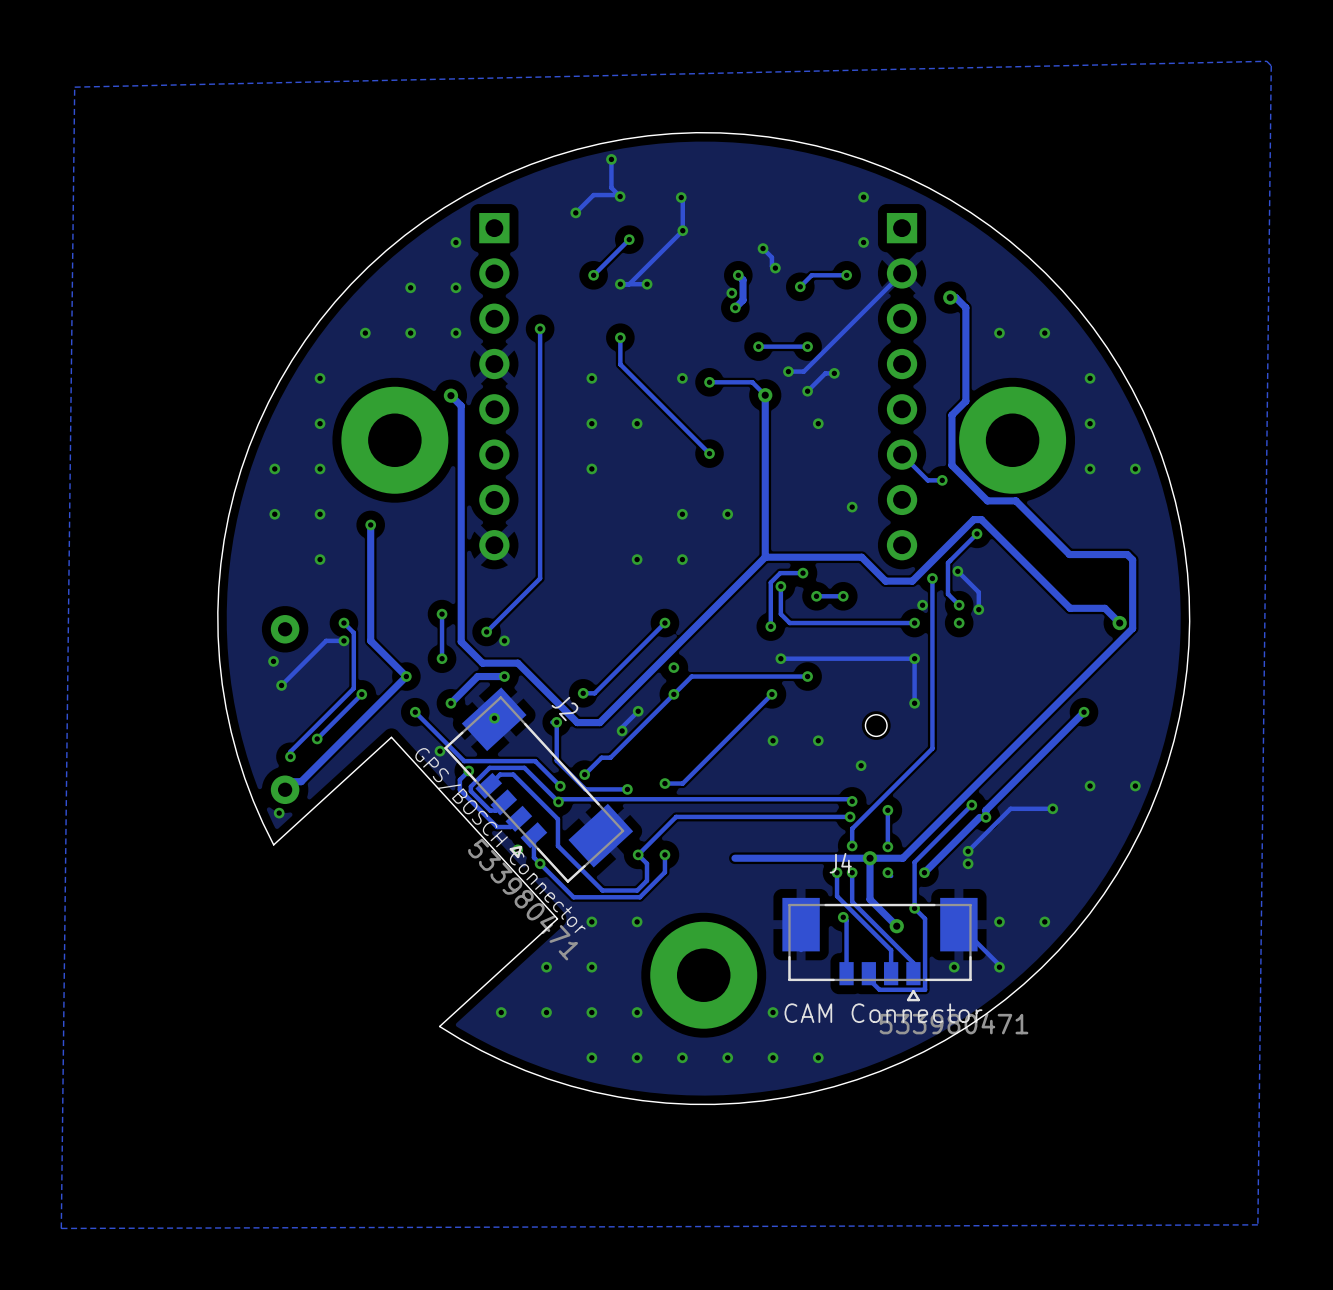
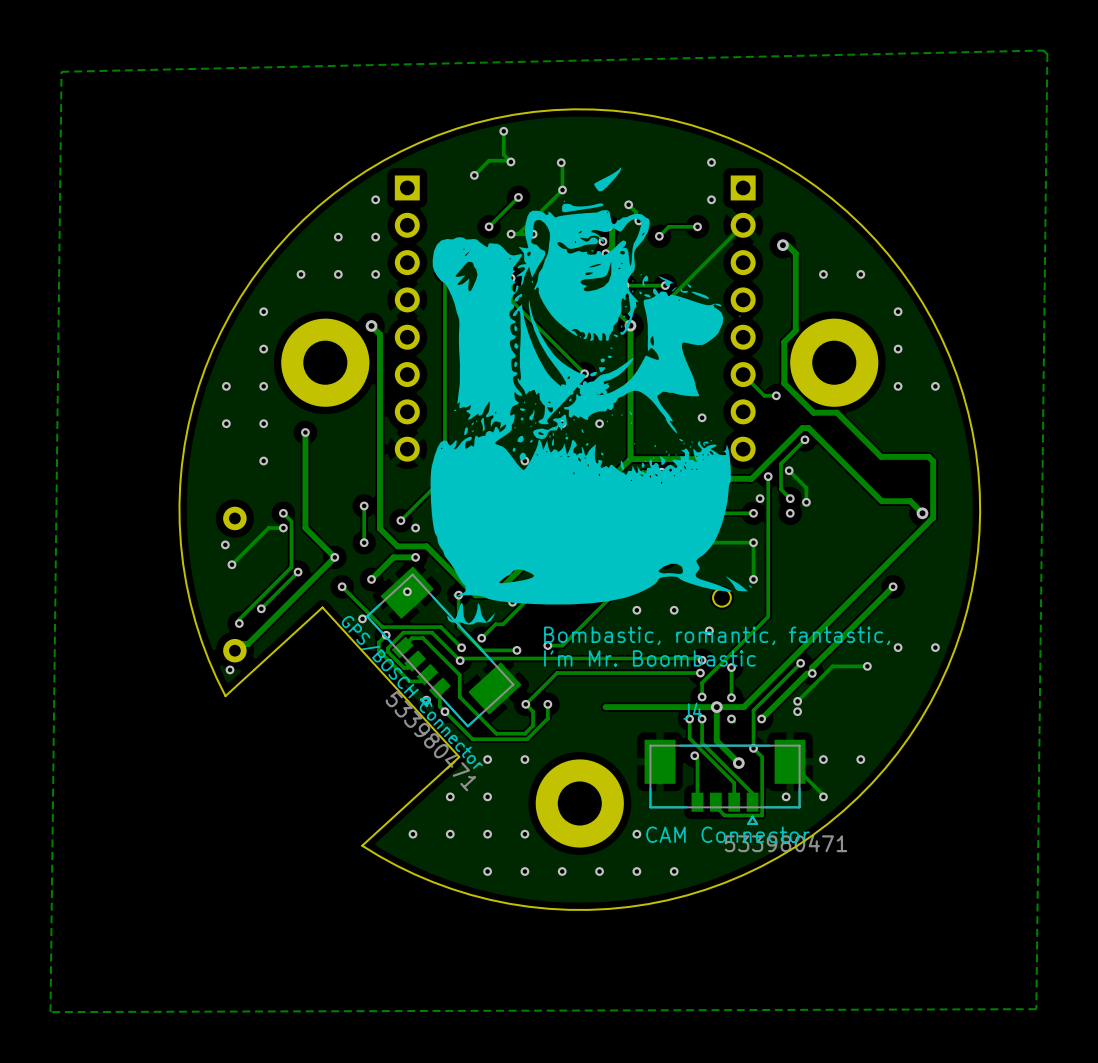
part: none -> (591, 395)
J2 name: J2 (564, 709) -> none
text: none -> Bombastic, romantic, fantastic, (717, 635)
text: none -> I'm Mr. Boombastic (649, 658)

